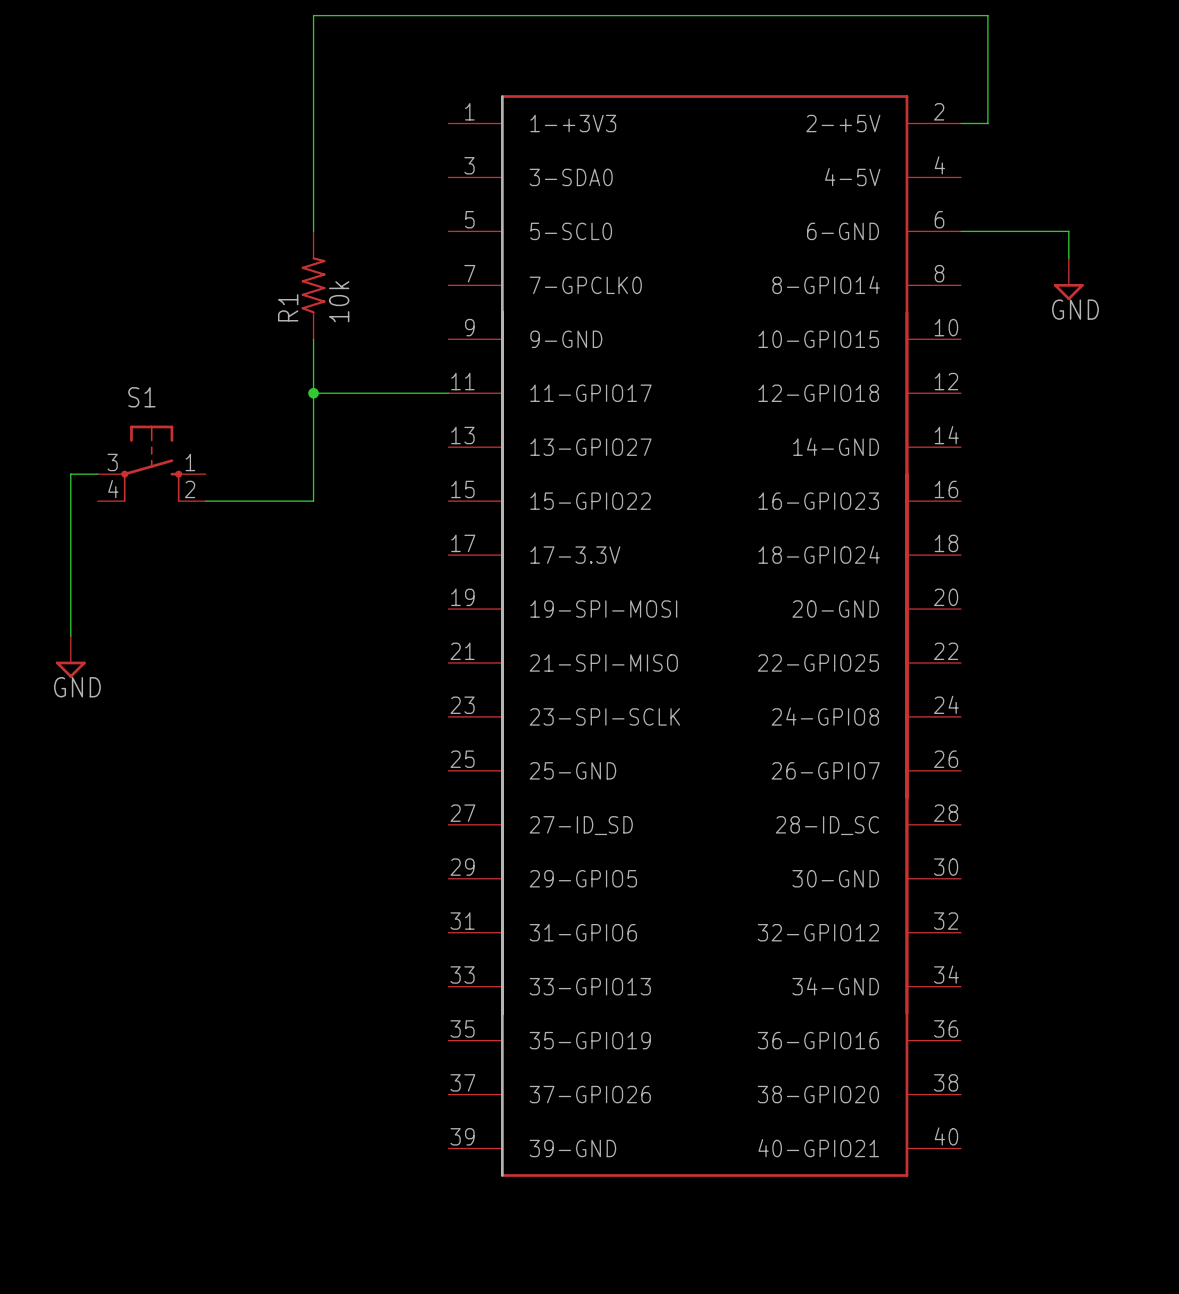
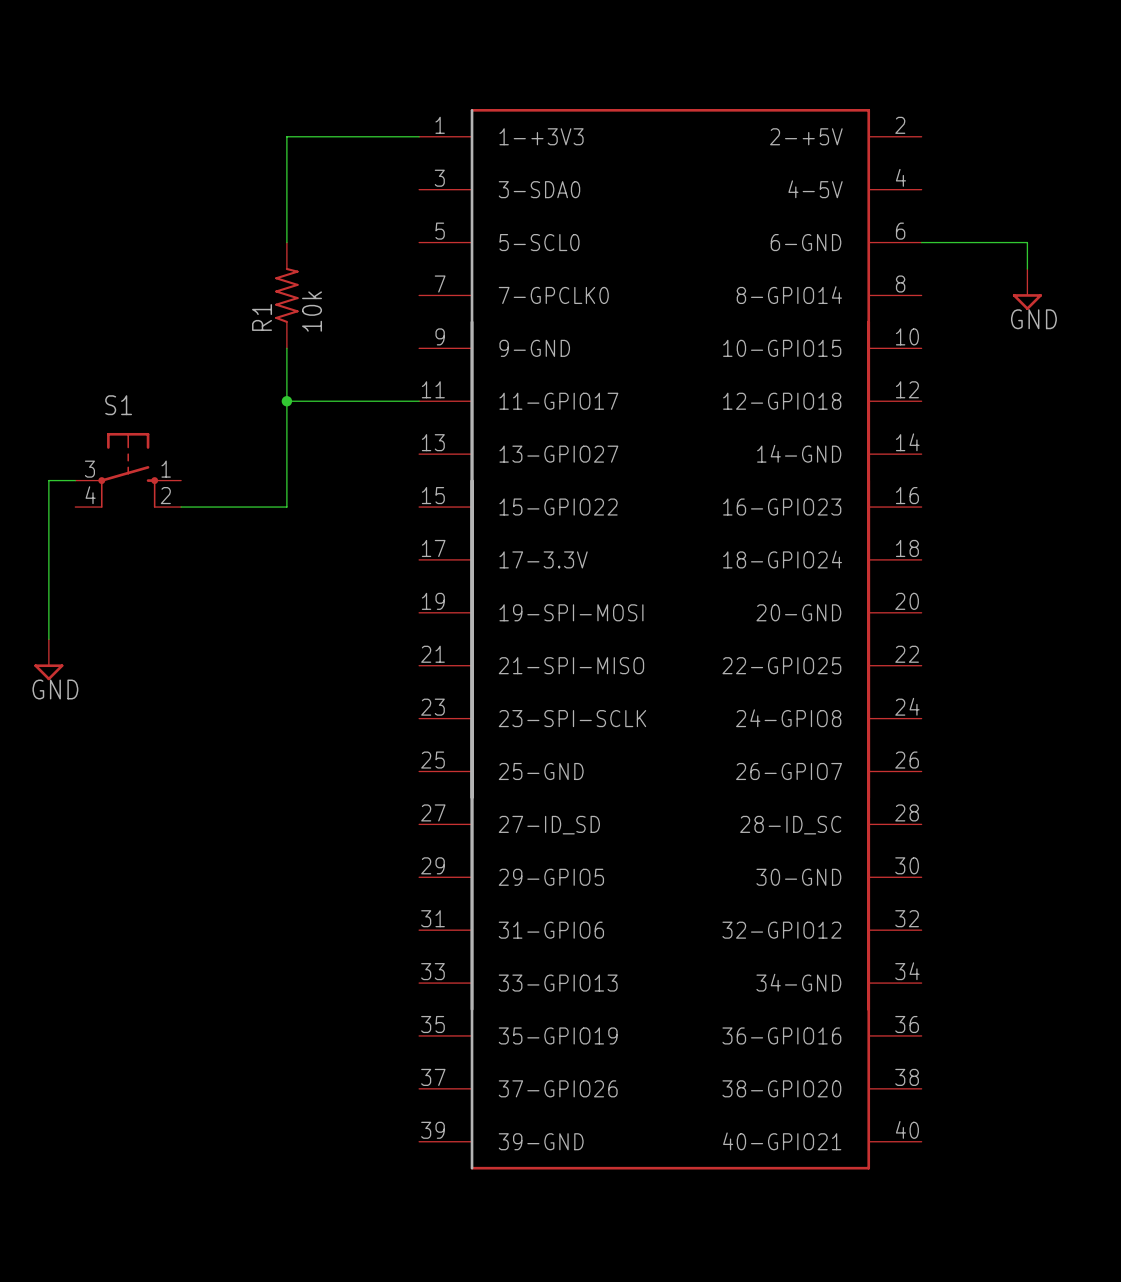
wire: (313, 123) (313, 15) (987, 15) (987, 123) (960, 123) -> (286, 136) (419, 136)

